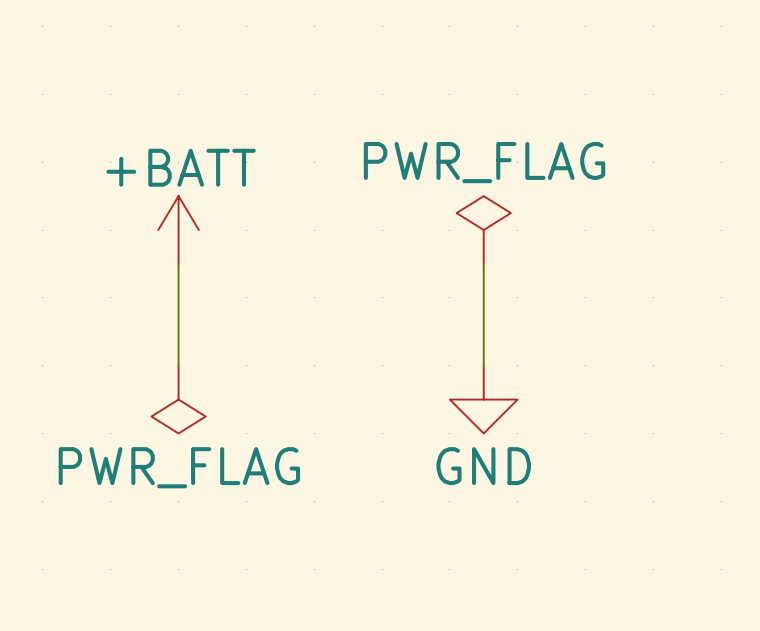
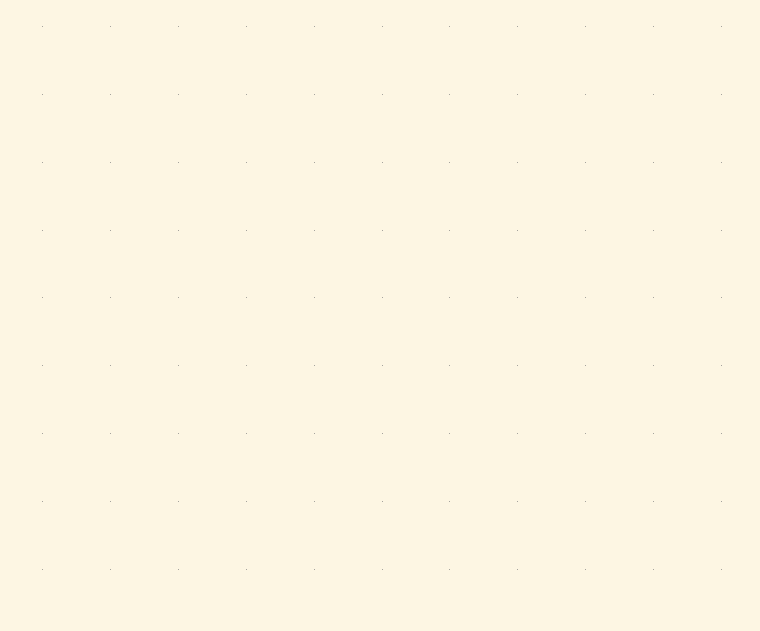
power symbol: +BATT (178, 230) -> none
power symbol: PWR_FLAG (483, 230) -> none
wire: (178, 263) (178, 365) -> none
wire: (483, 263) (483, 365) -> none
power symbol: PWR_FLAG (178, 399) -> none
power symbol: GND (483, 399) -> none

